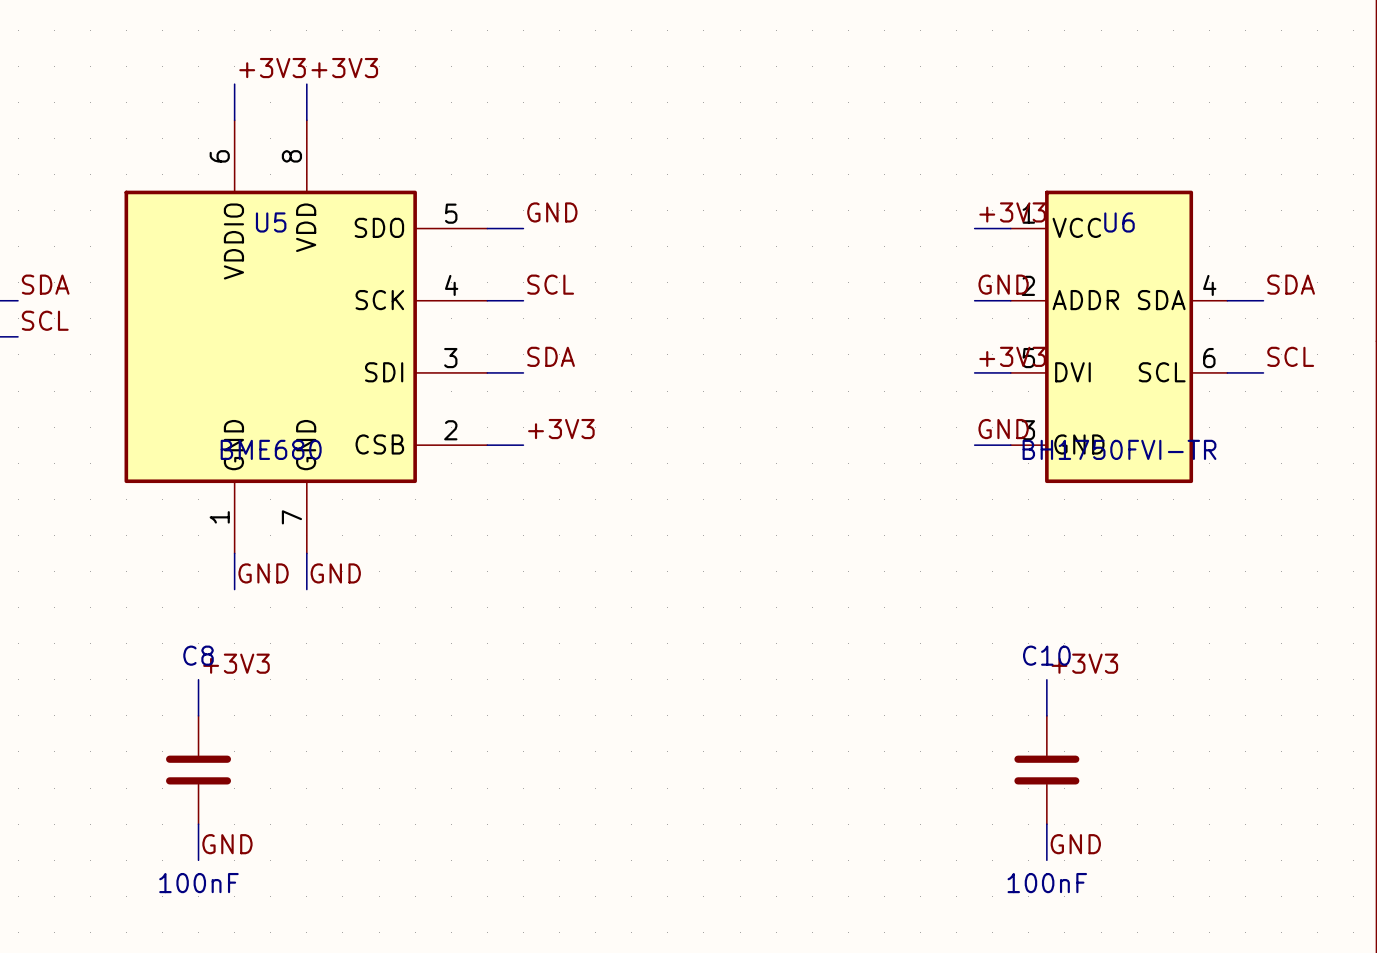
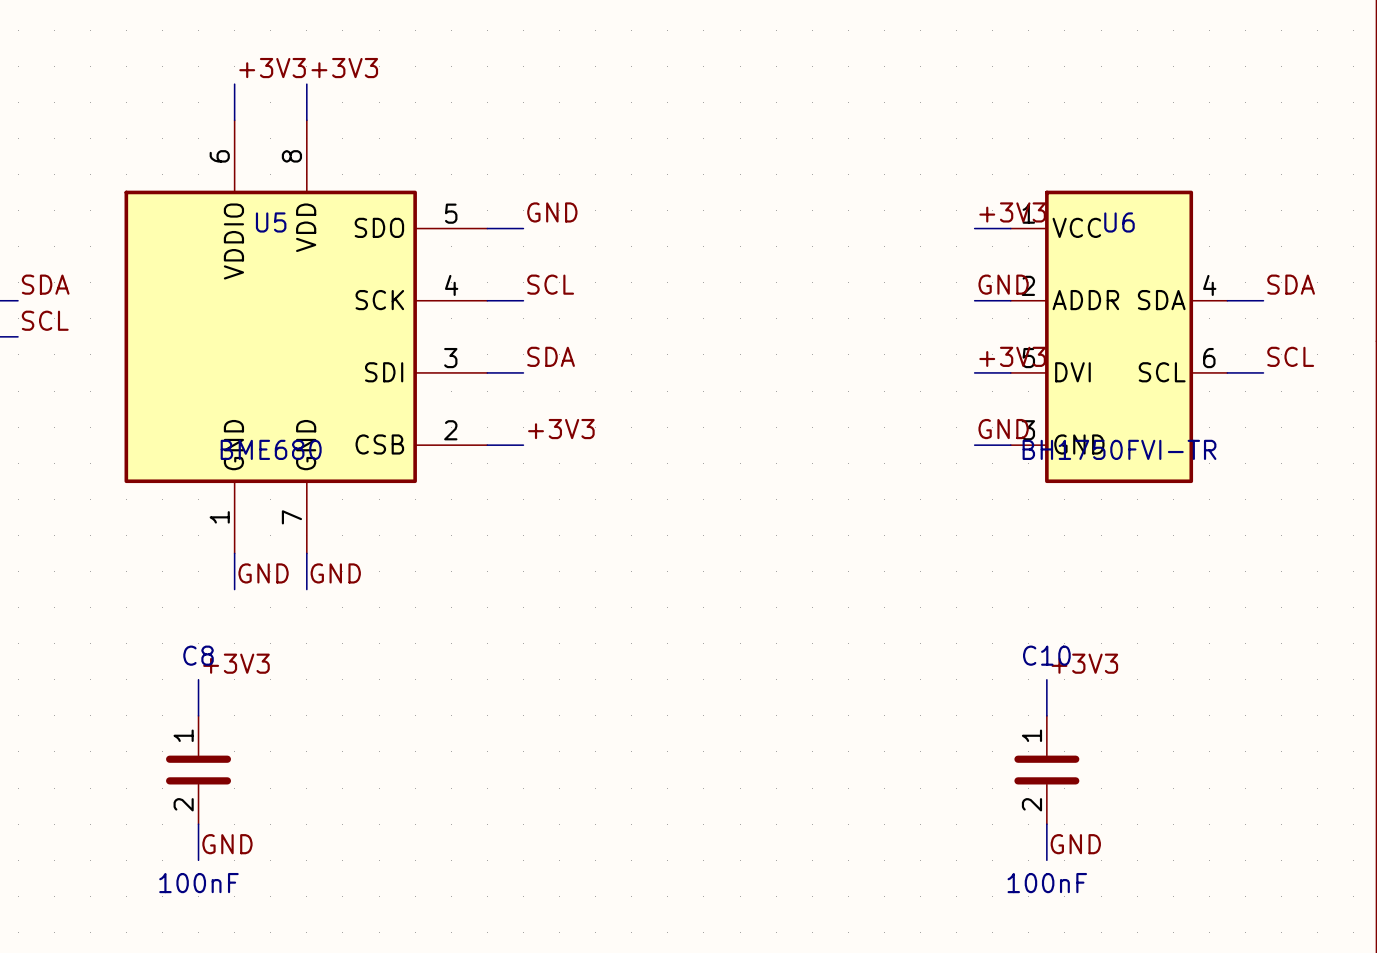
C8 pin number: none -> 1 (183, 735)
C10 pin number: none -> 1 (1031, 735)
C8 pin number: none -> 2 (183, 804)
C10 pin number: none -> 2 (1031, 804)

